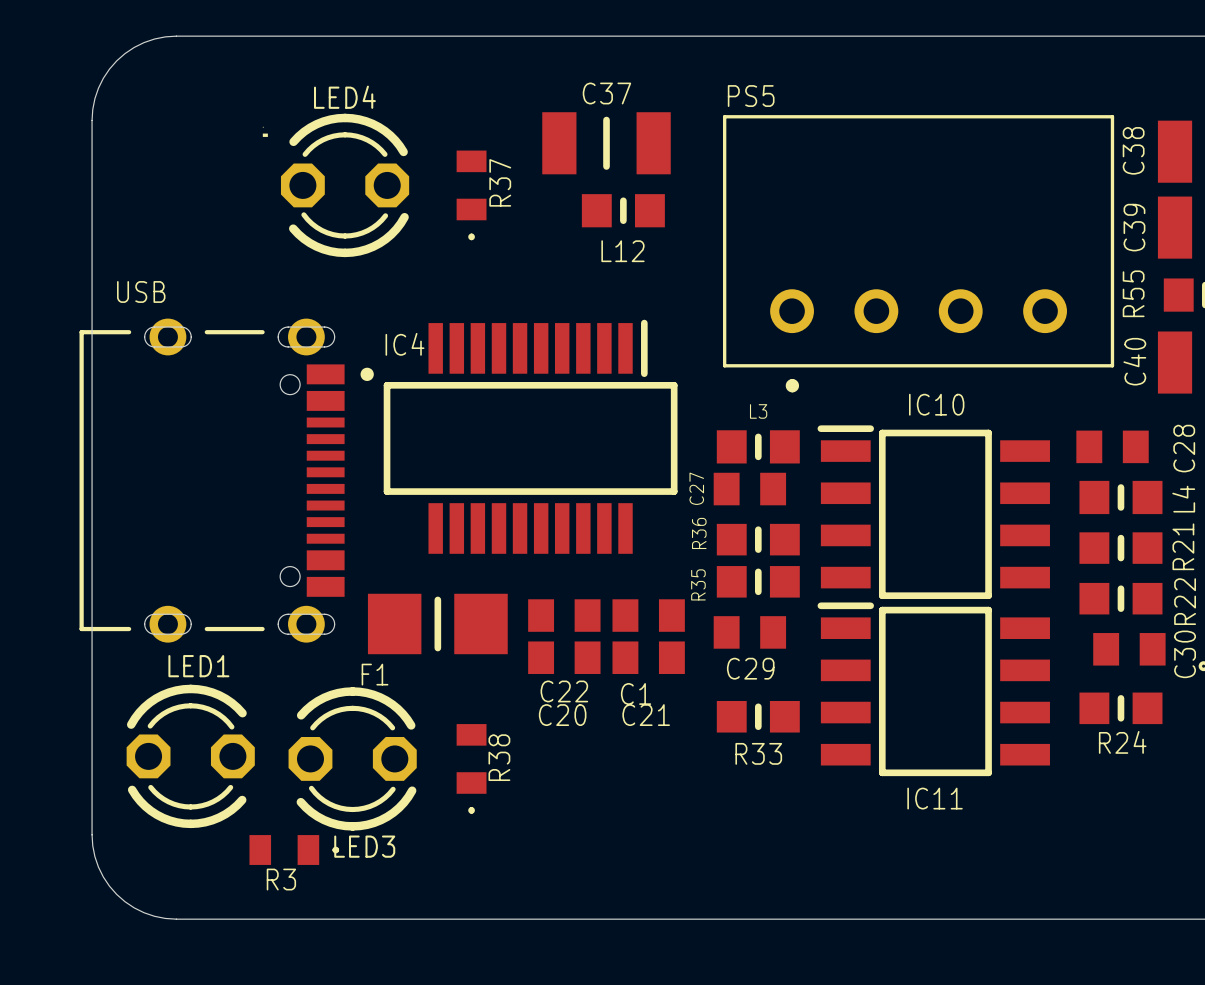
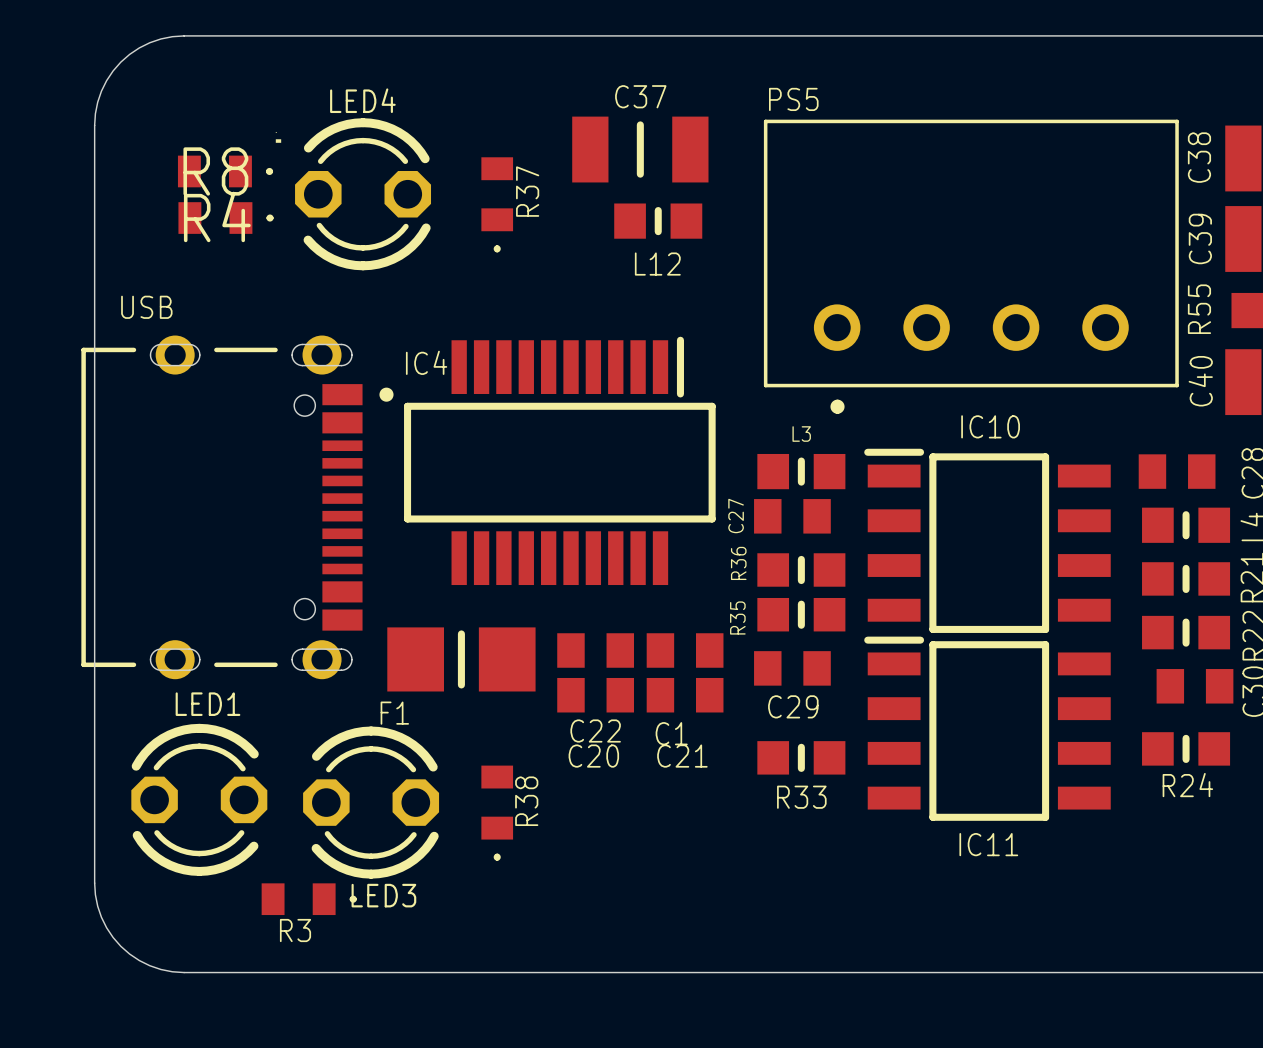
R8: none -> (225, 171)
R4: none -> (225, 218)

